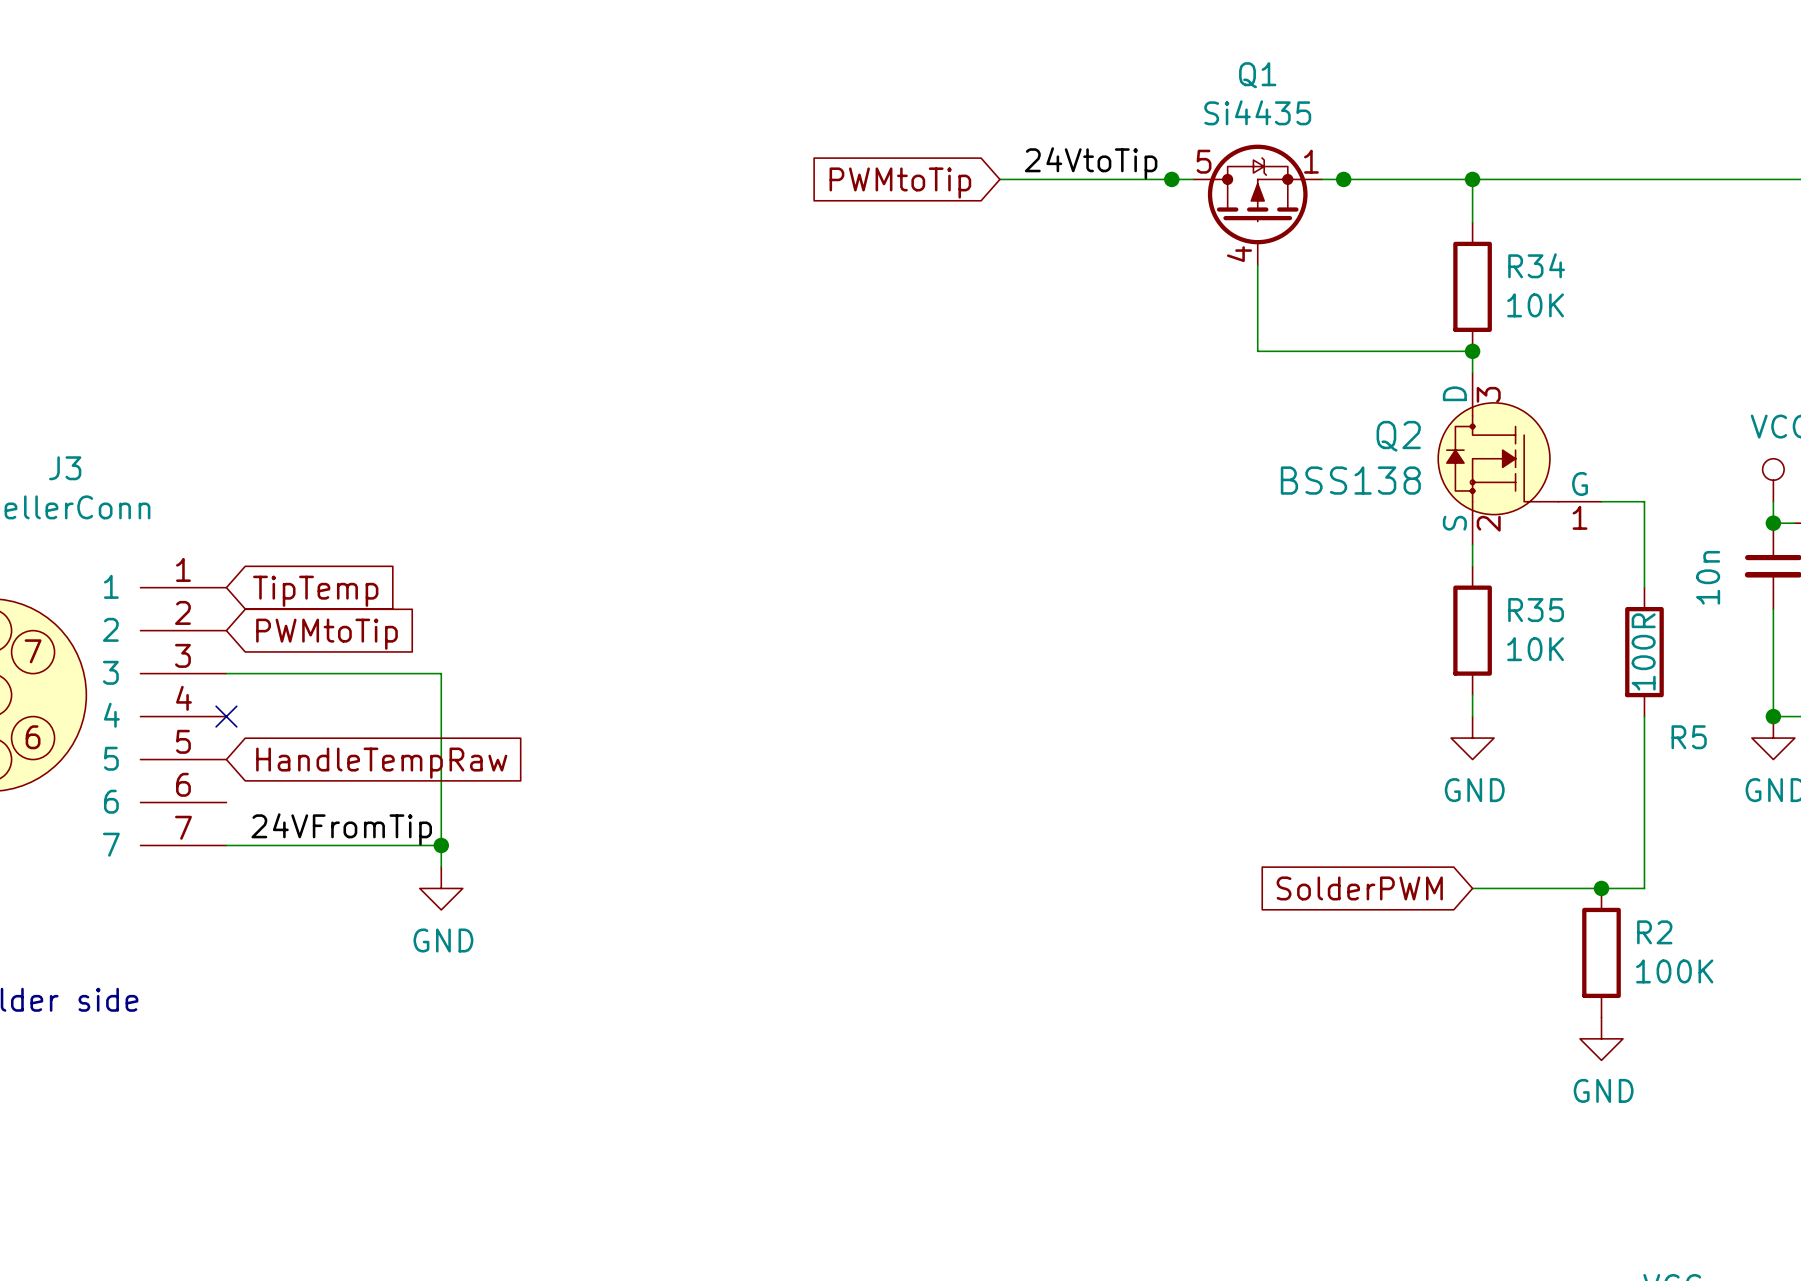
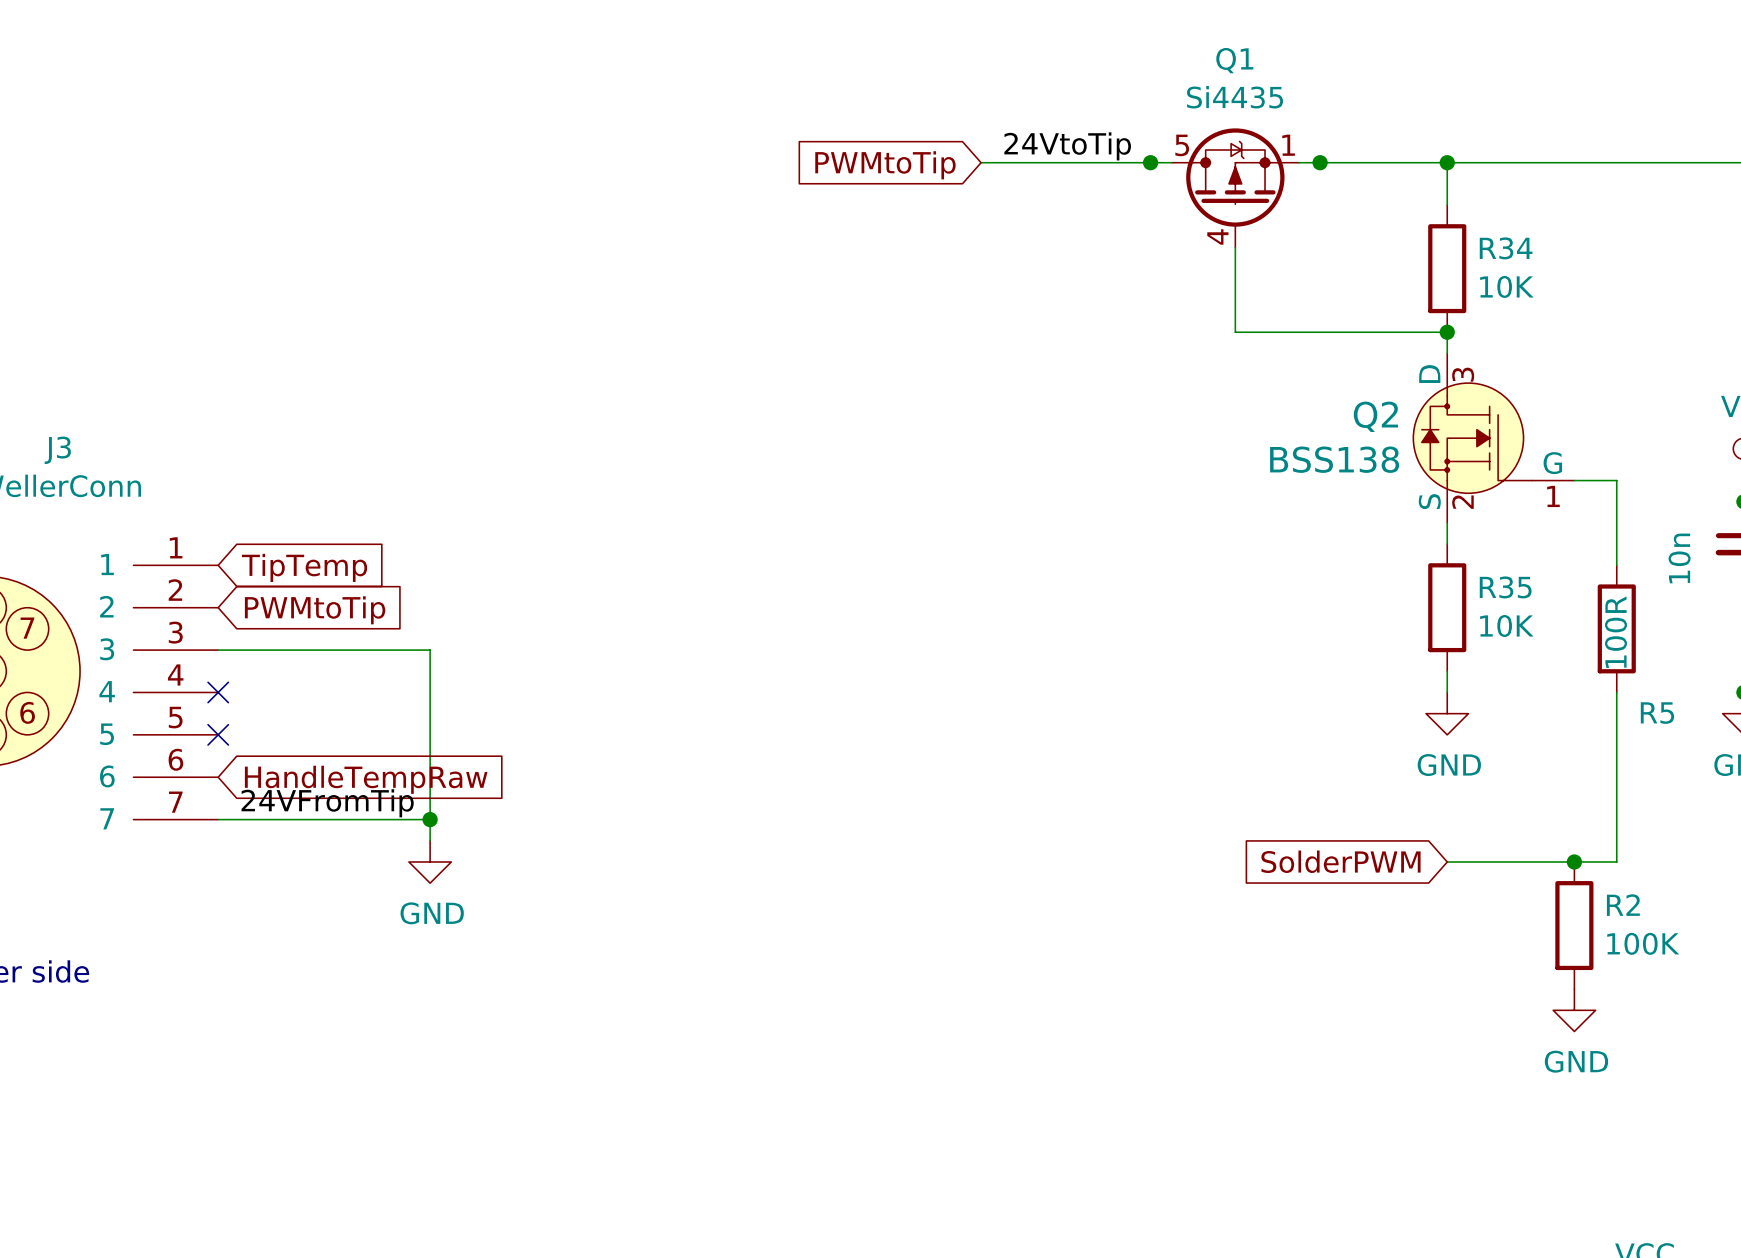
no-connect mark: none -> (218, 734)
global label position: HandleTempRaw (381, 763) -> HandleTempRaw (366, 779)

